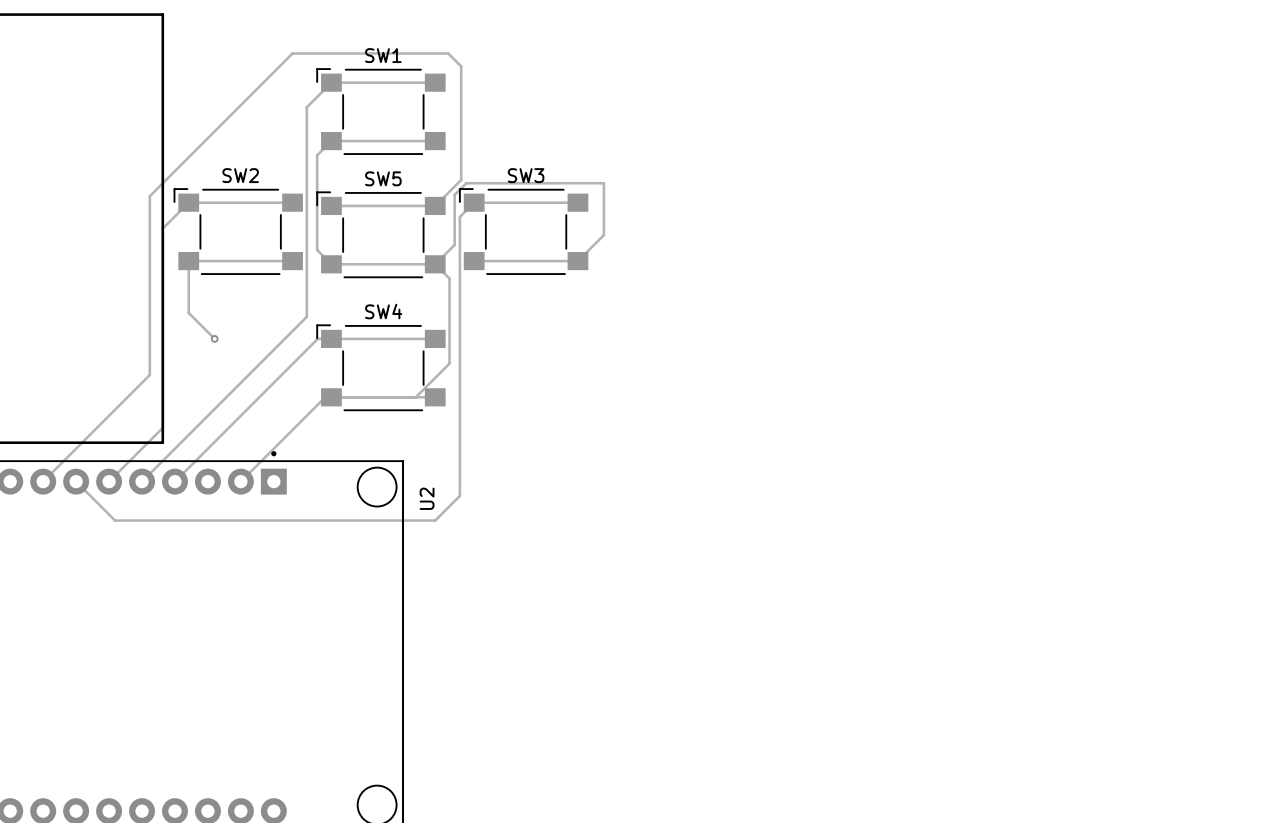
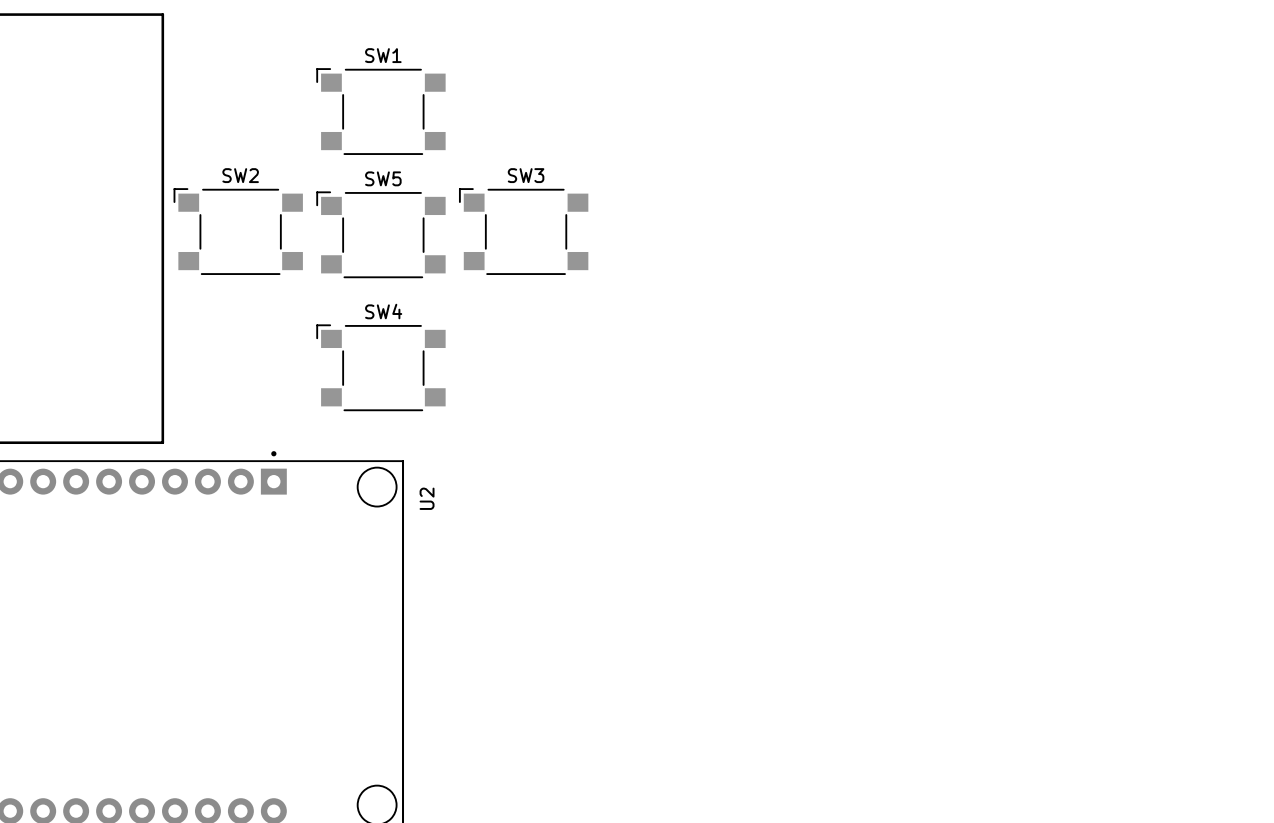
track: (435, 82) (331, 82) (306, 107) (306, 316) (142, 481) -> none
track: (435, 141) (331, 141) (317, 155) (317, 250) (331, 264) (435, 264) -> none
track: (292, 202) (188, 202) (162, 228) (162, 427) (109, 481) -> none
track: (577, 202) (474, 202) (459, 216) (459, 495) (435, 520) (115, 520) (76, 481) -> none
track: (331, 205) (435, 205) (461, 179) (461, 66) (448, 53) (292, 53) (149, 196) (149, 374) (43, 481) -> none
track: (292, 261) (188, 261) (188, 312) (214, 338) -> none
track: (474, 261) (577, 261) (603, 235) (603, 183) (466, 183) (454, 194) (454, 244) (435, 264) -> none
track: (435, 264) (449, 278) (449, 363) (415, 397) -> none
via: (214, 338) -> none
track: (435, 338) (317, 338) (174, 481) -> none
track: (435, 397) (325, 397) (240, 481) -> none

